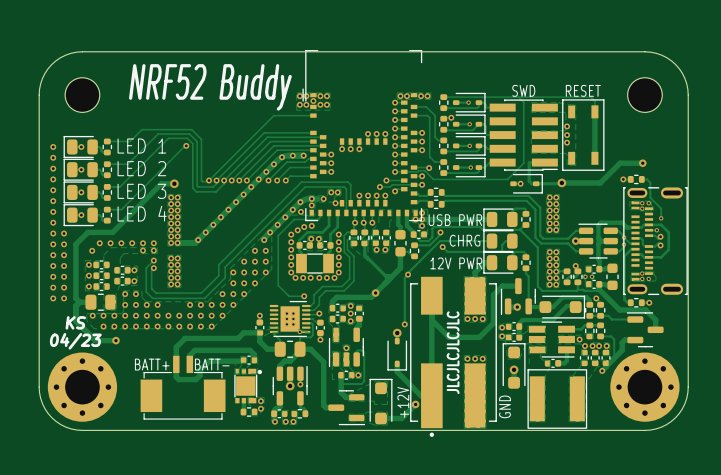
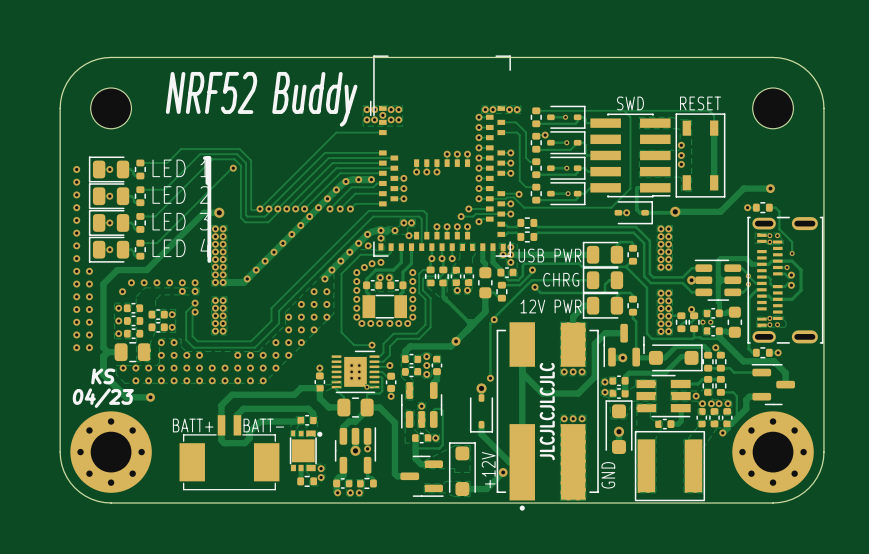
line: none -> (204, 158) (209, 158) (209, 261)
line: none -> (207, 158) (207, 183)

